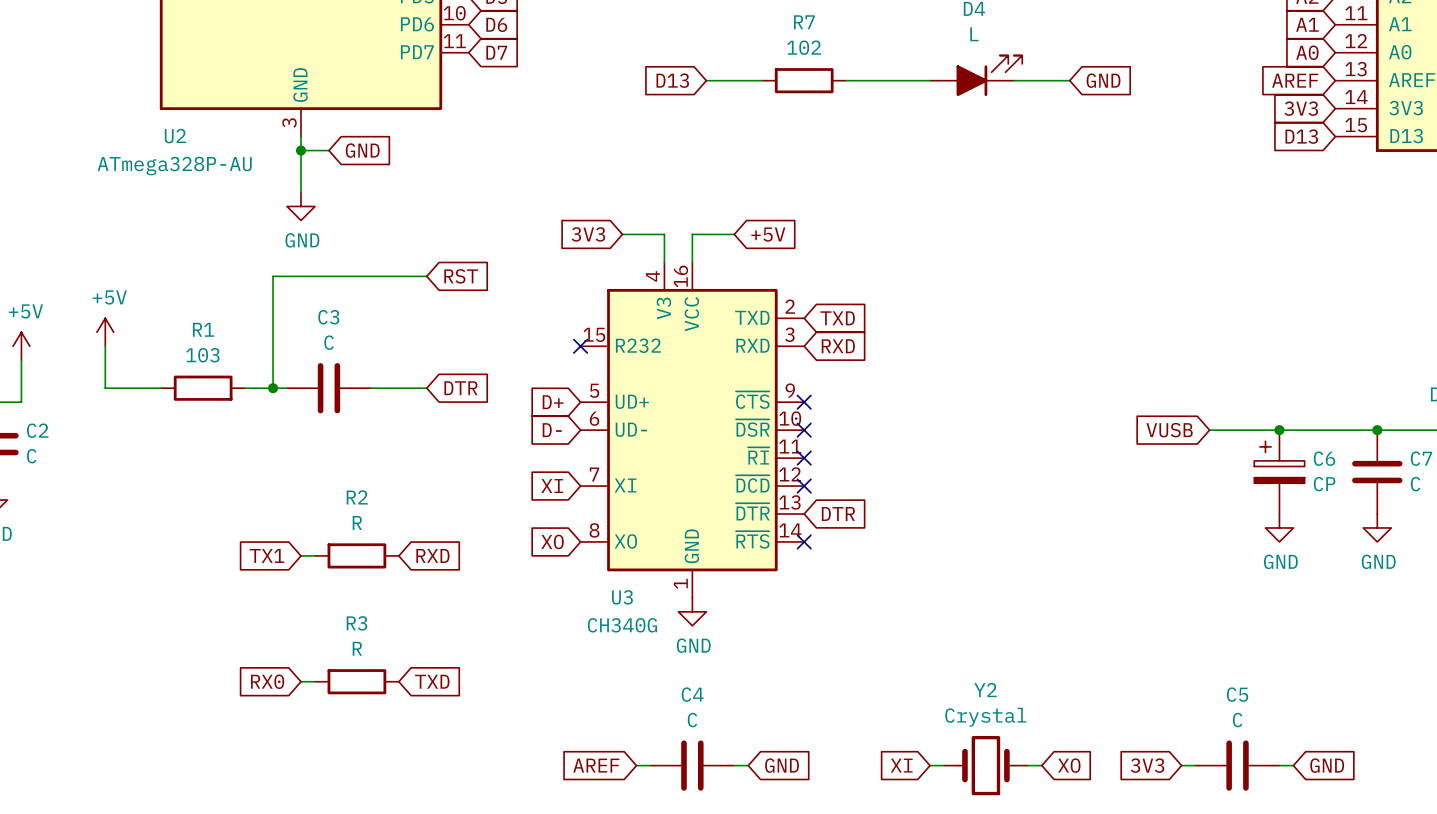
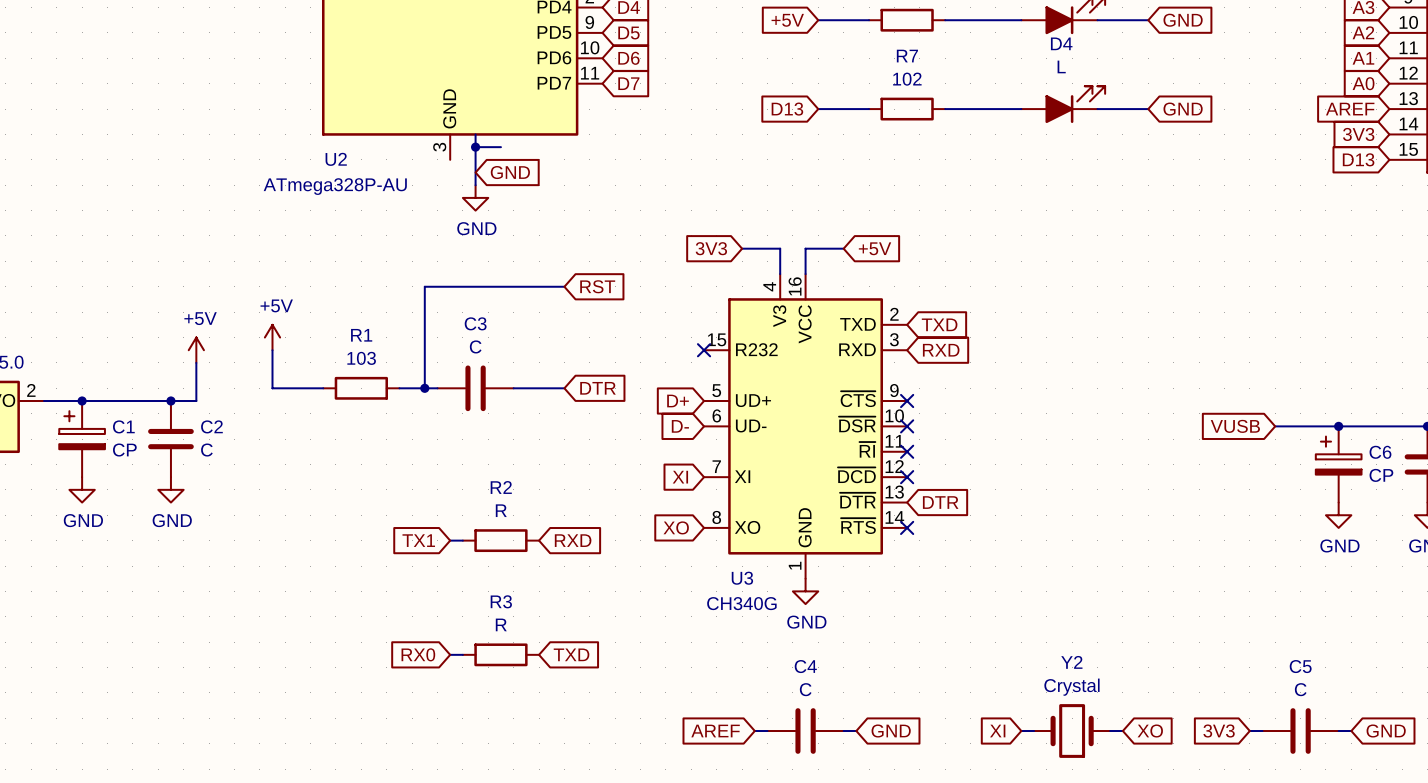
wire: (301, 136) (301, 192) -> (475, 134) (475, 185)
wire: (301, 150) (328, 150) -> (475, 147) (500, 147)
junction position: (301, 150) -> (475, 147)
power symbol position: GND (301, 206) -> GND (475, 197)

